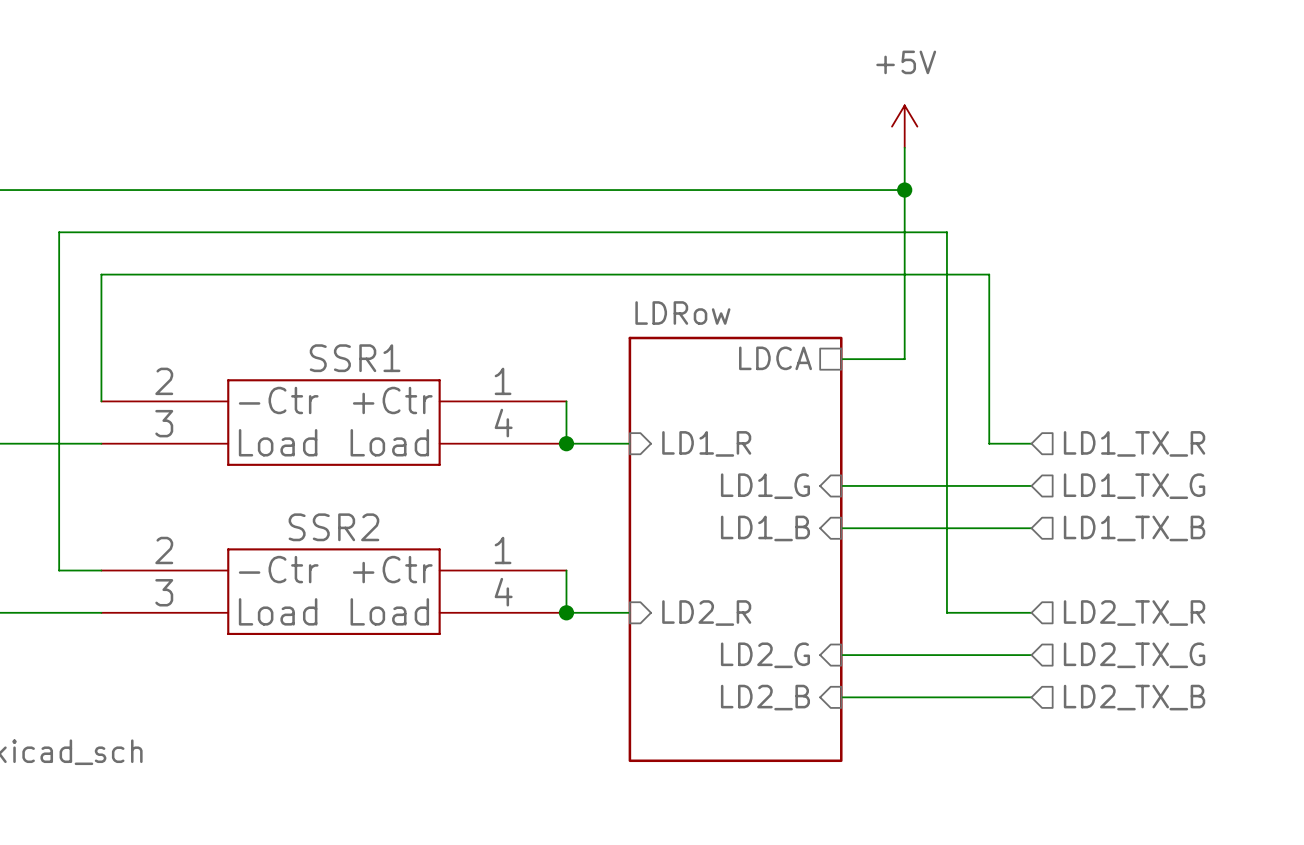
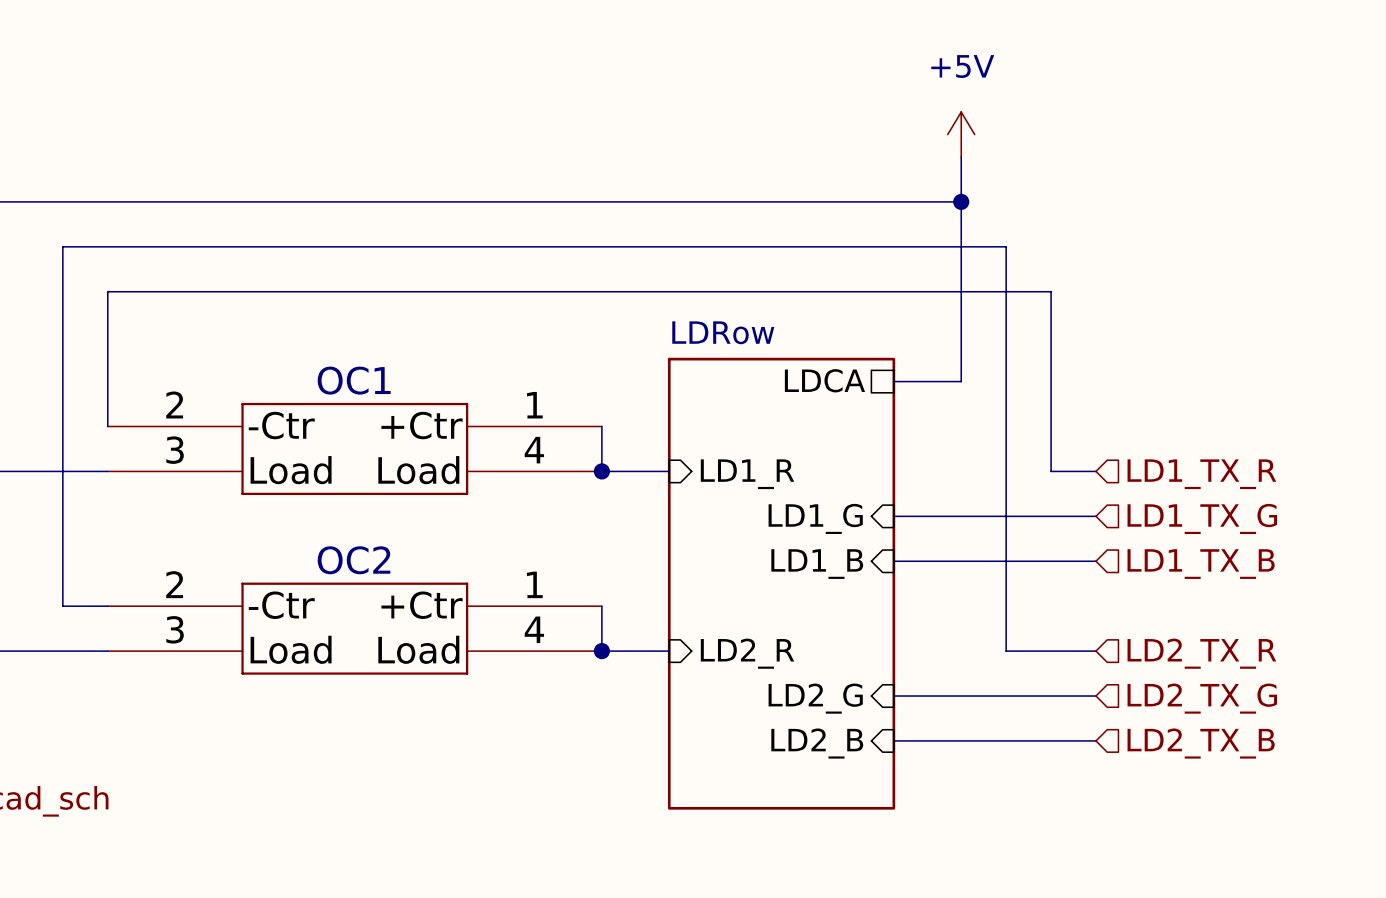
SSR1 name: SSR1 (355, 358) -> OC1 (354, 380)
SSR2 name: SSR2 (333, 527) -> OC2 (354, 560)

